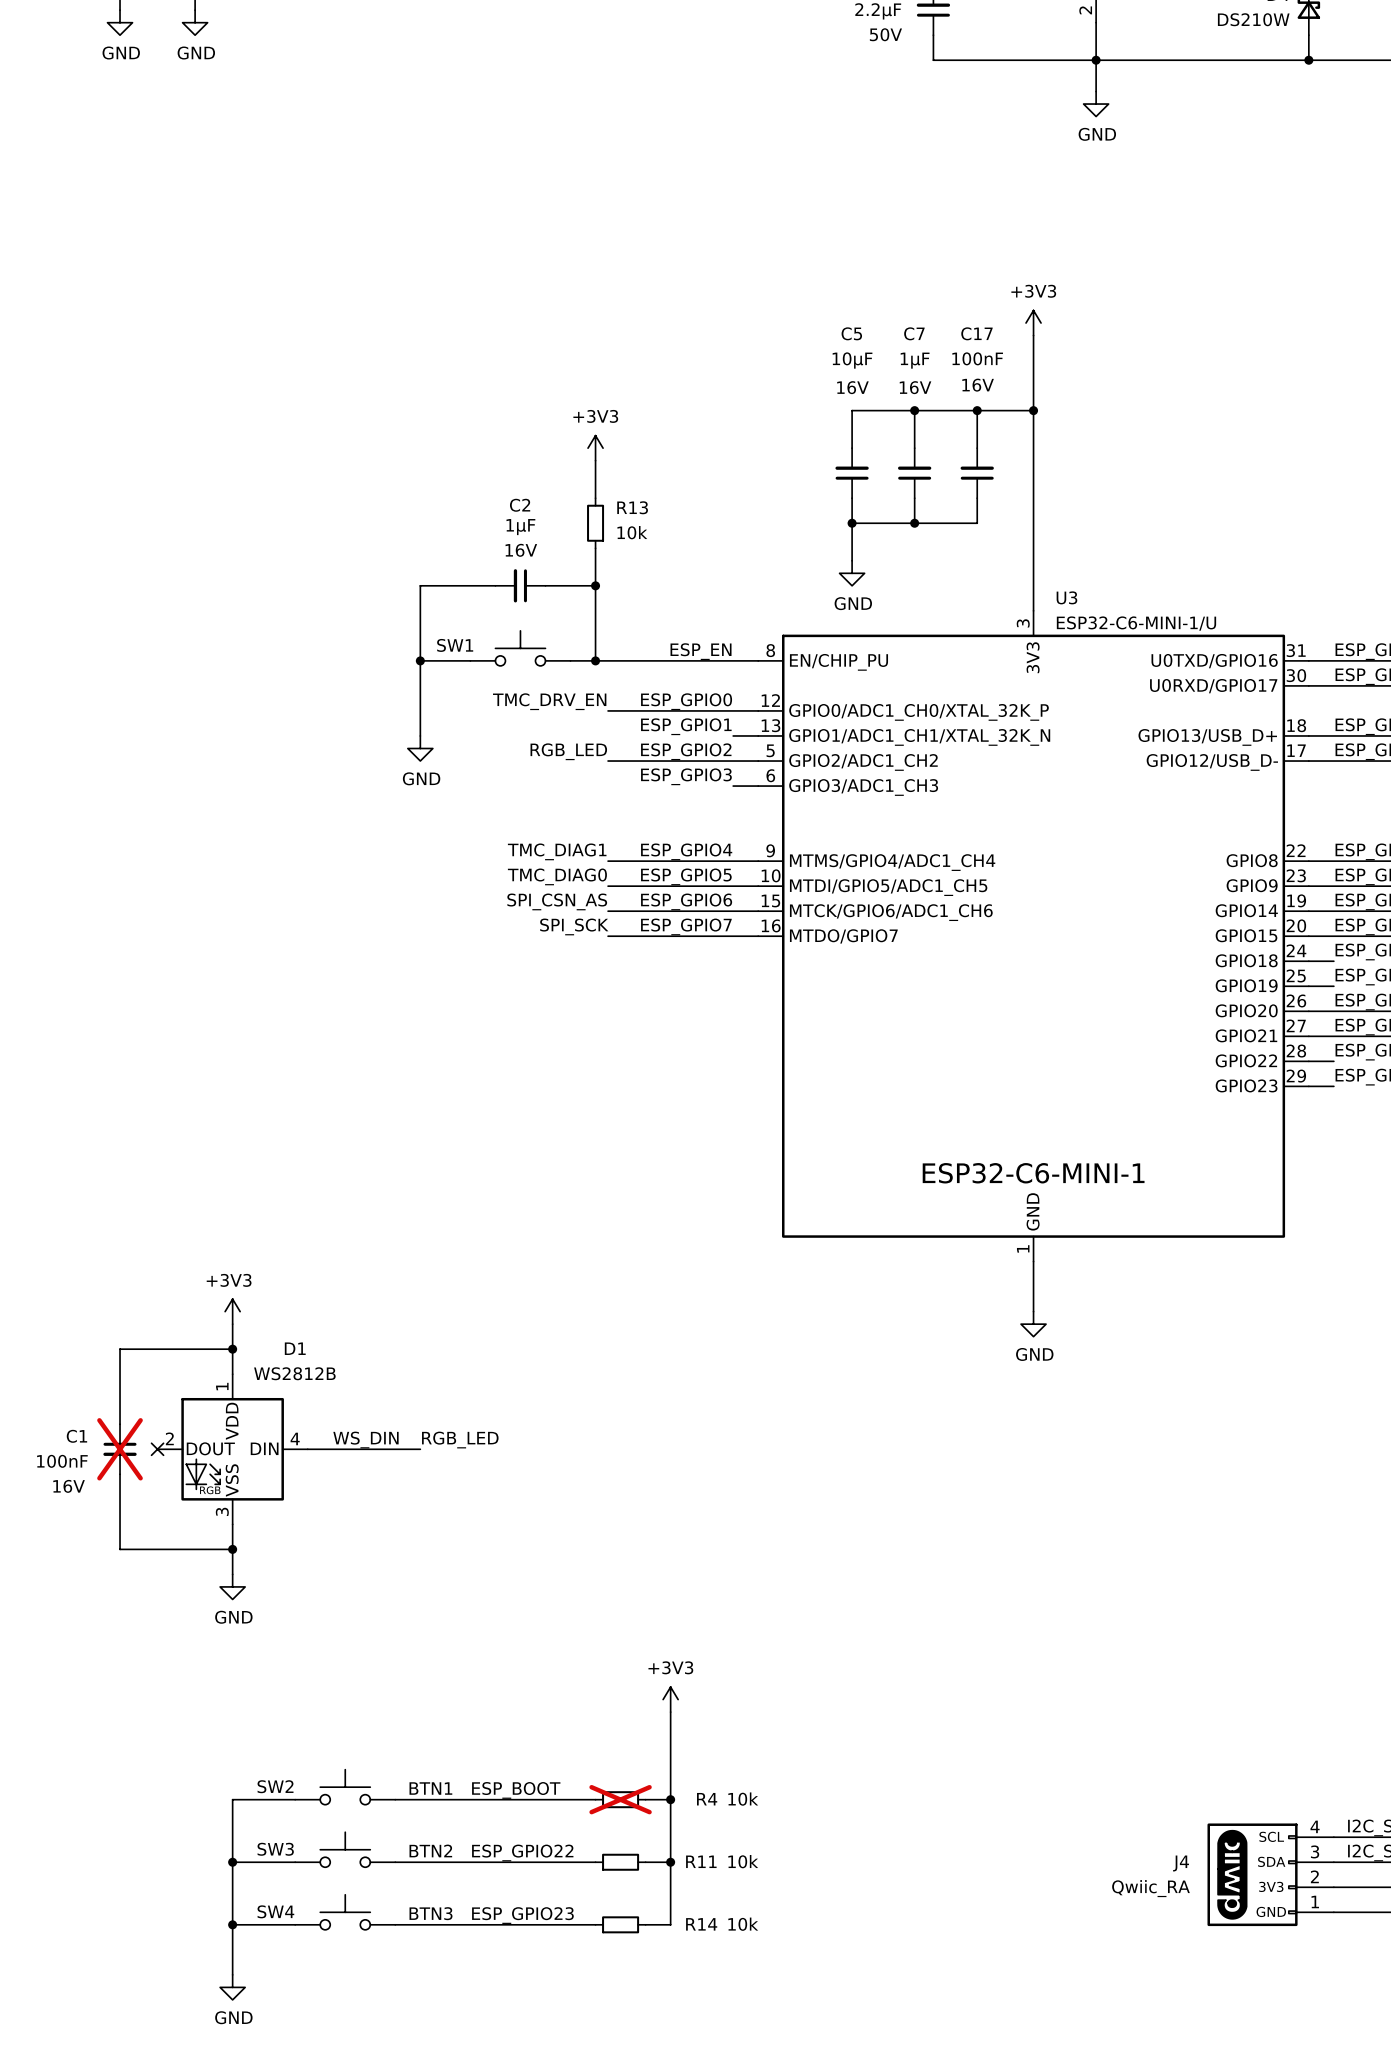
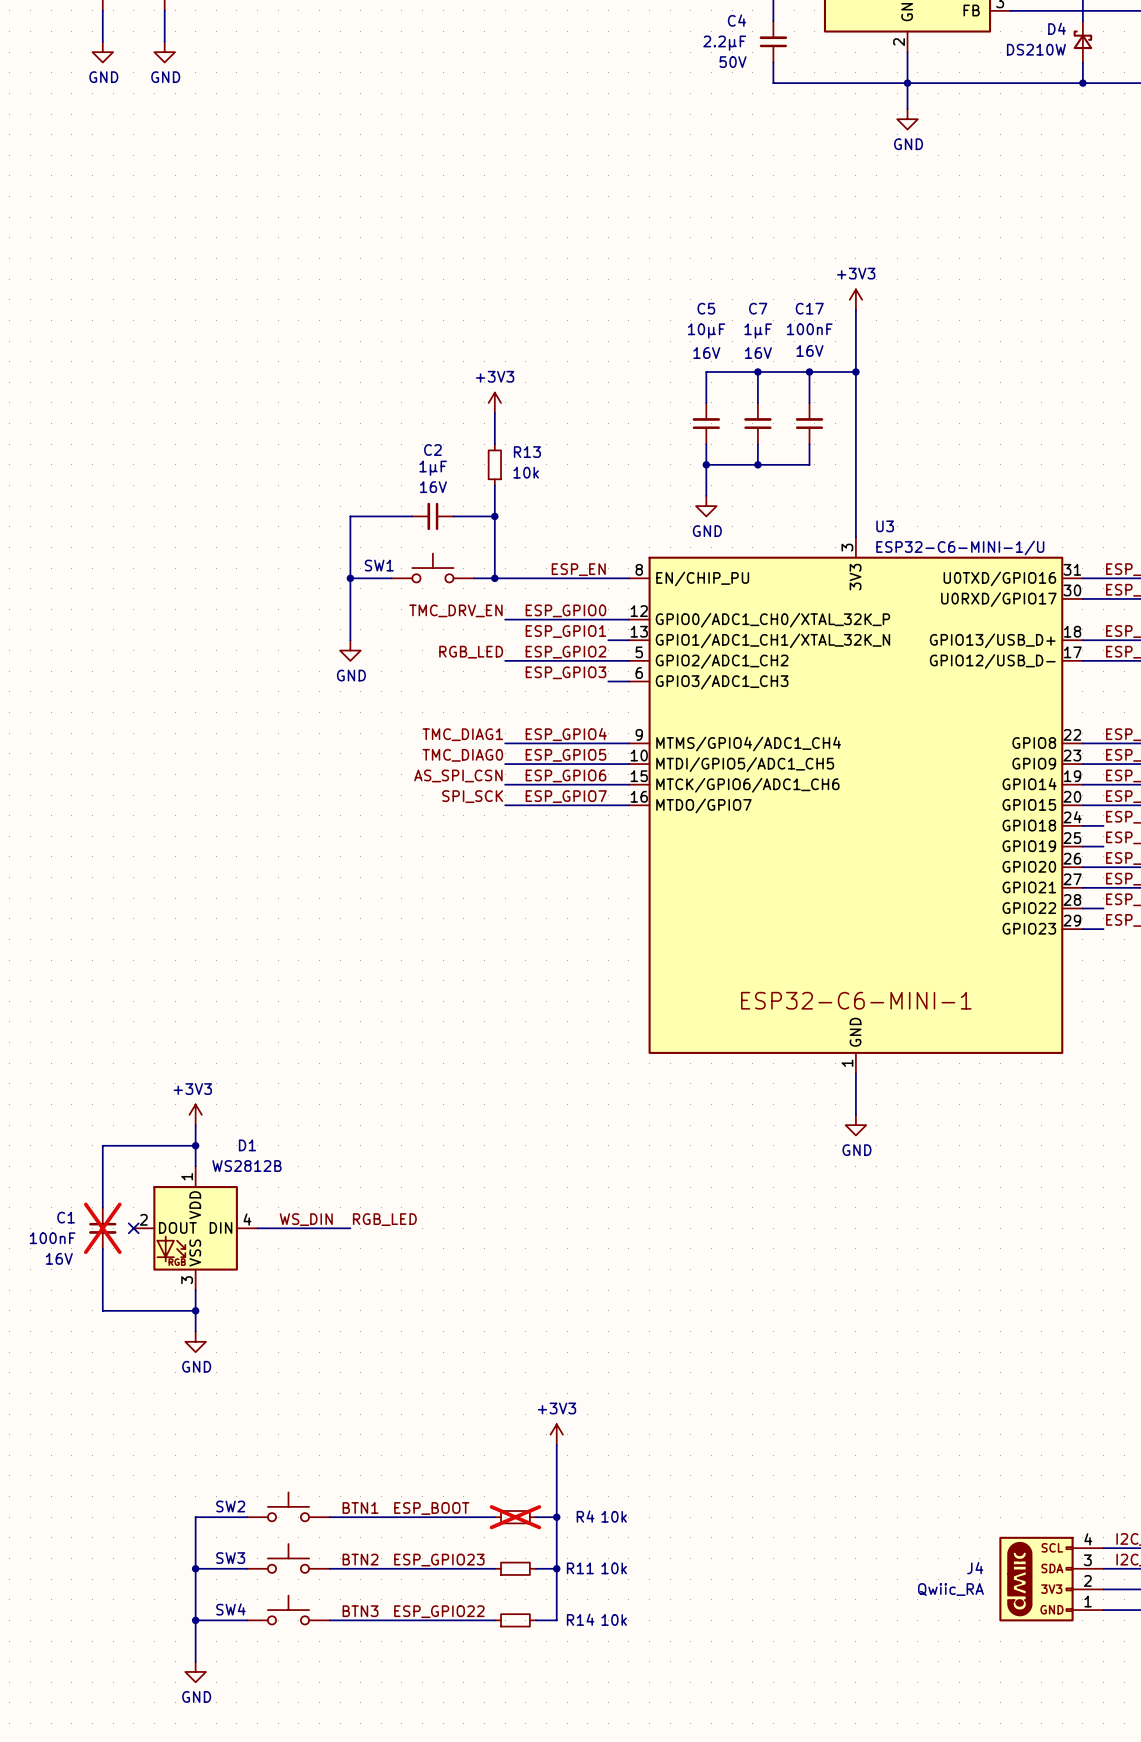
label: SPI_CSN_AS (557, 901) -> AS_SPI_CSN (458, 775)
label: ESP_GPIO22 (522, 1852) -> ESP_GPIO23 (439, 1560)
label: ESP_GPIO23 (522, 1915) -> ESP_GPIO22 (439, 1611)

